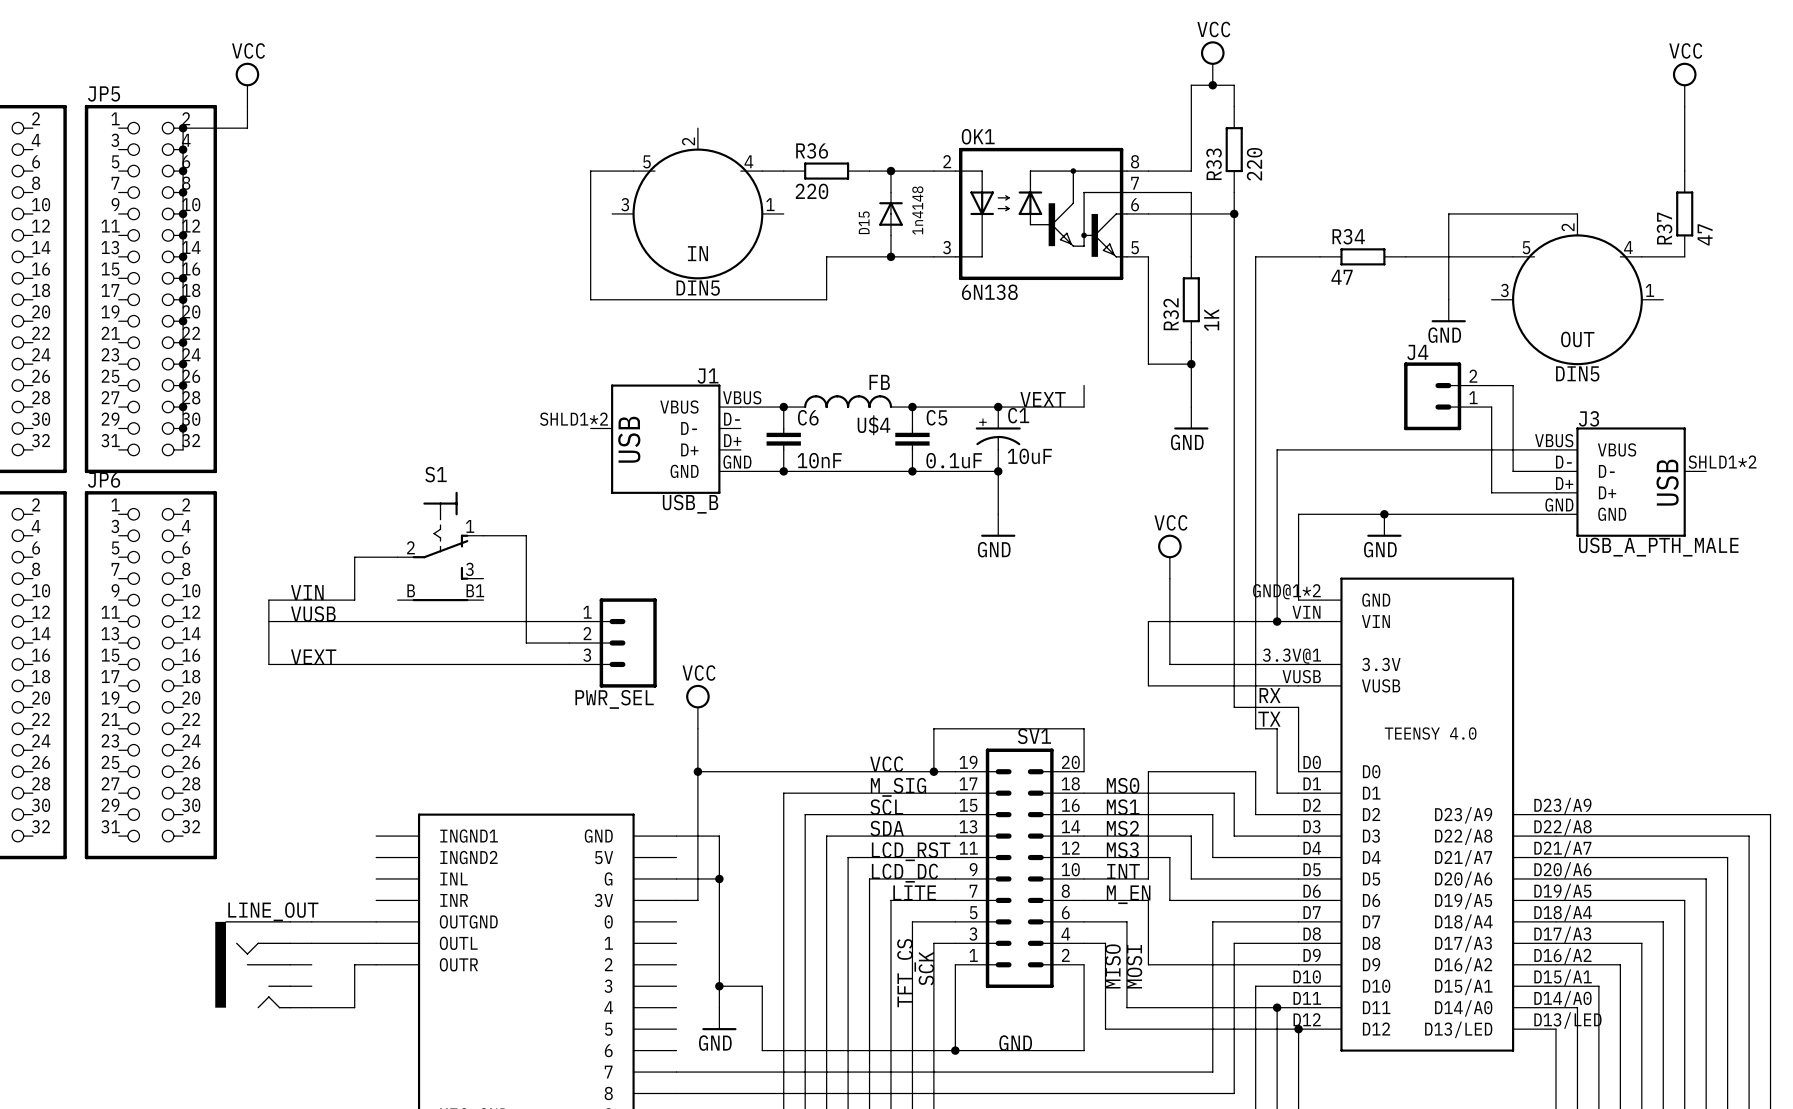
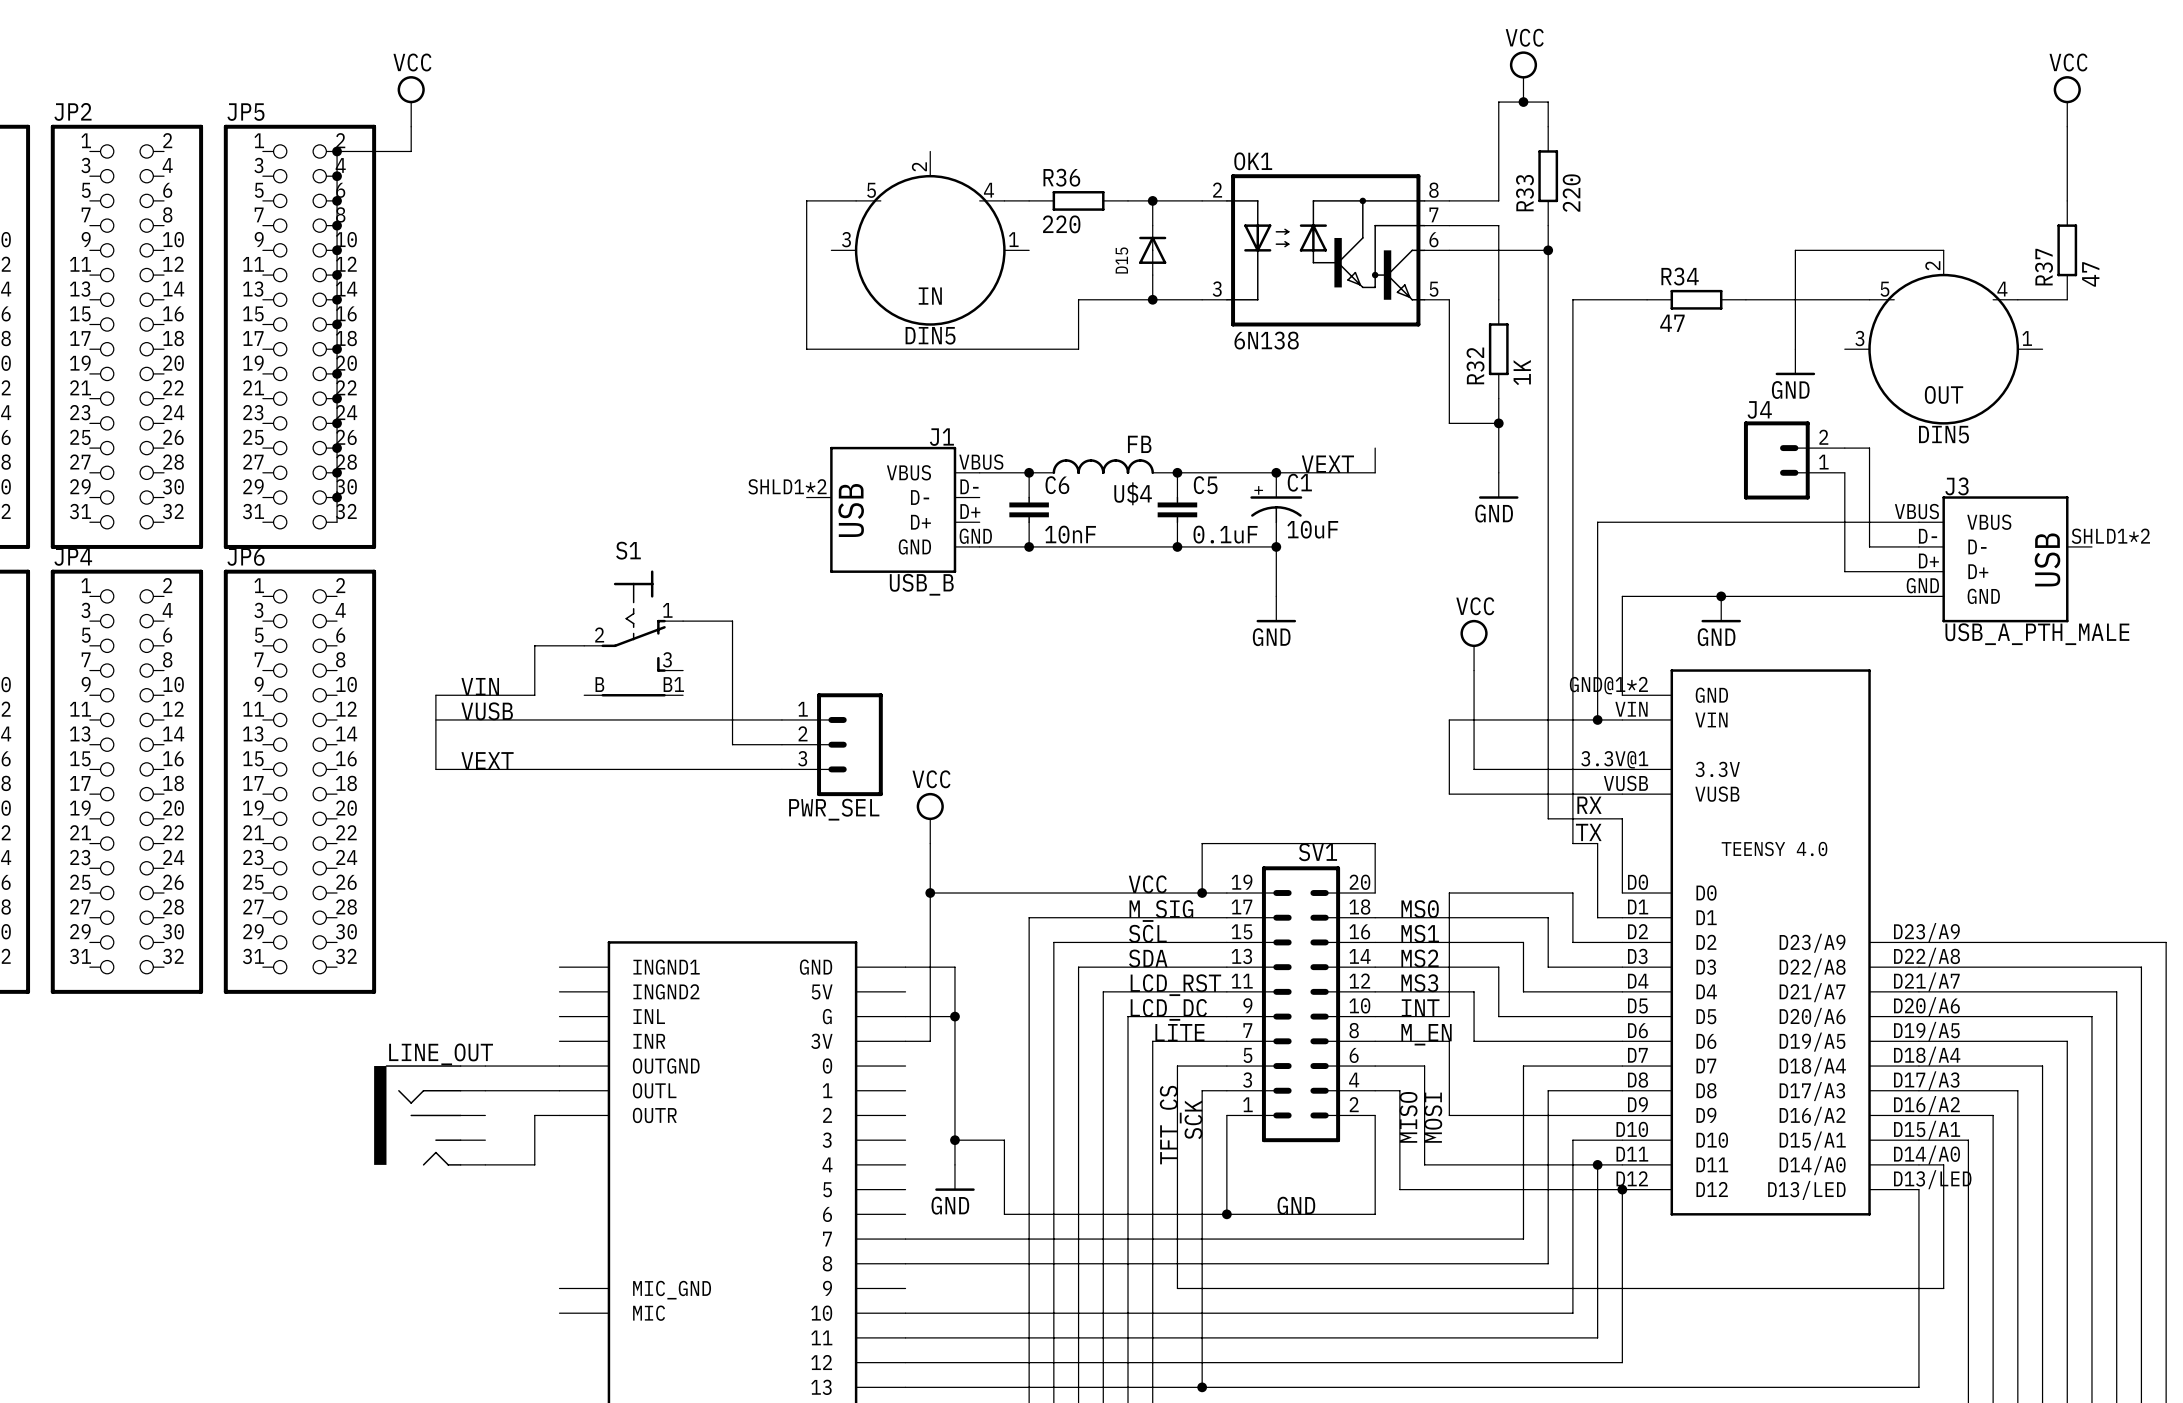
D15 value: 1n4148 (917, 210) -> none

